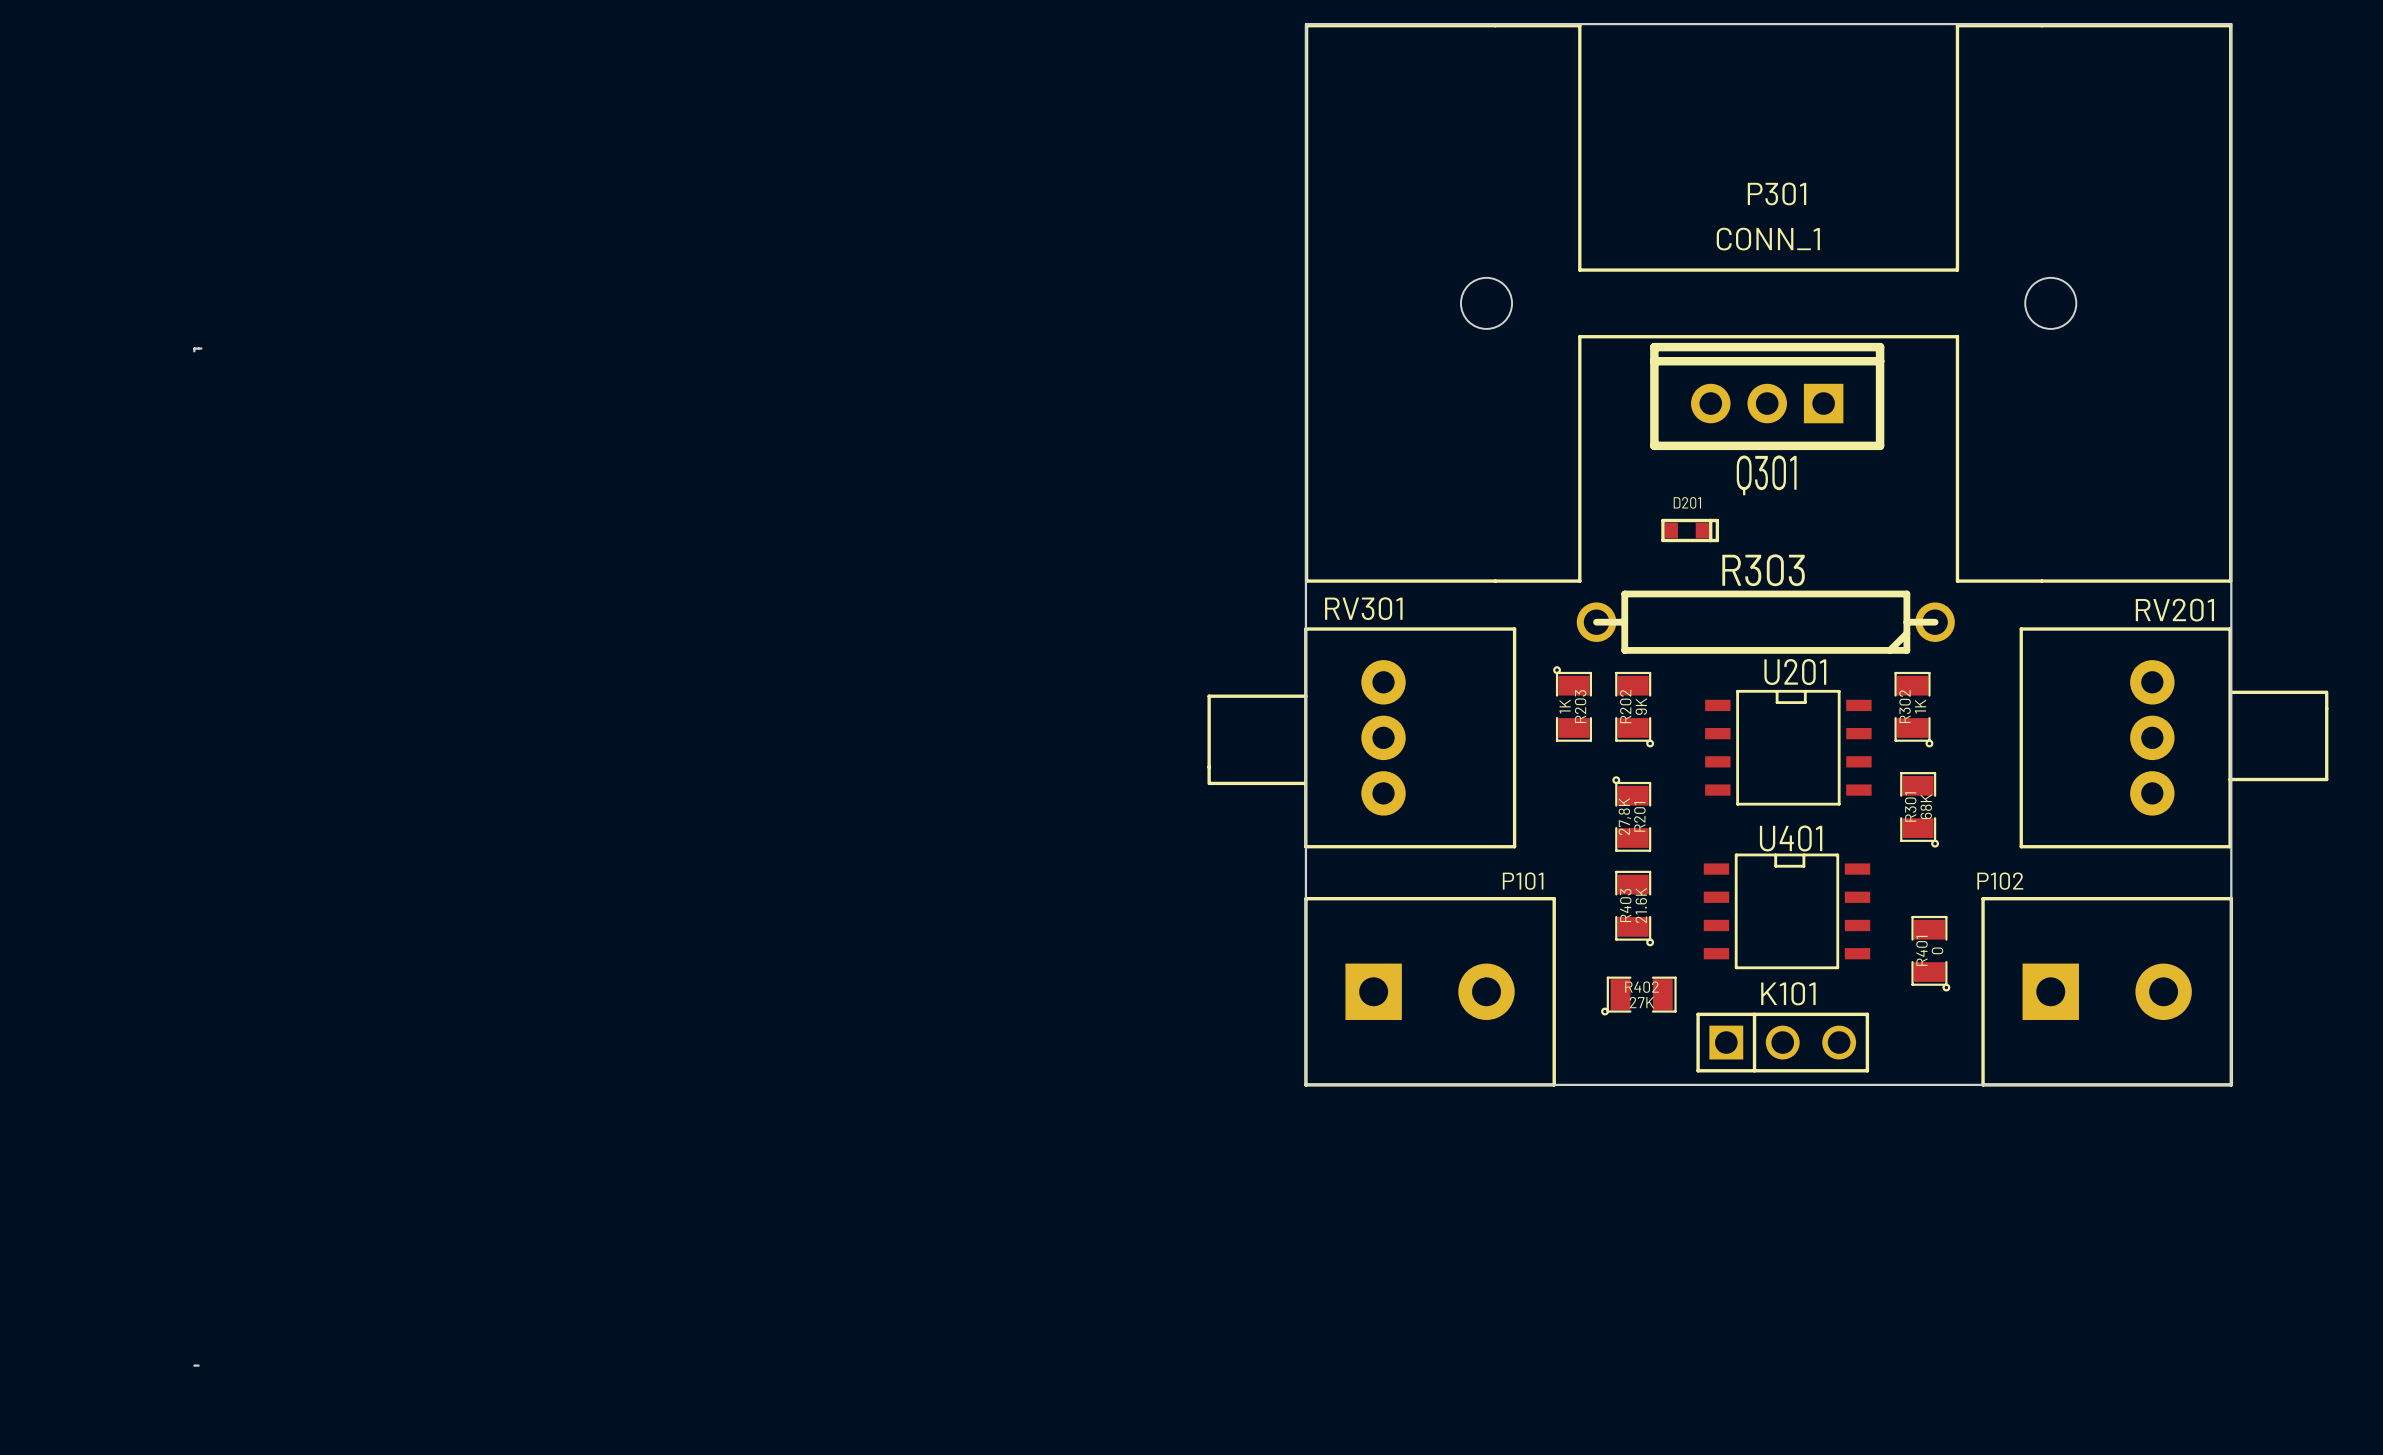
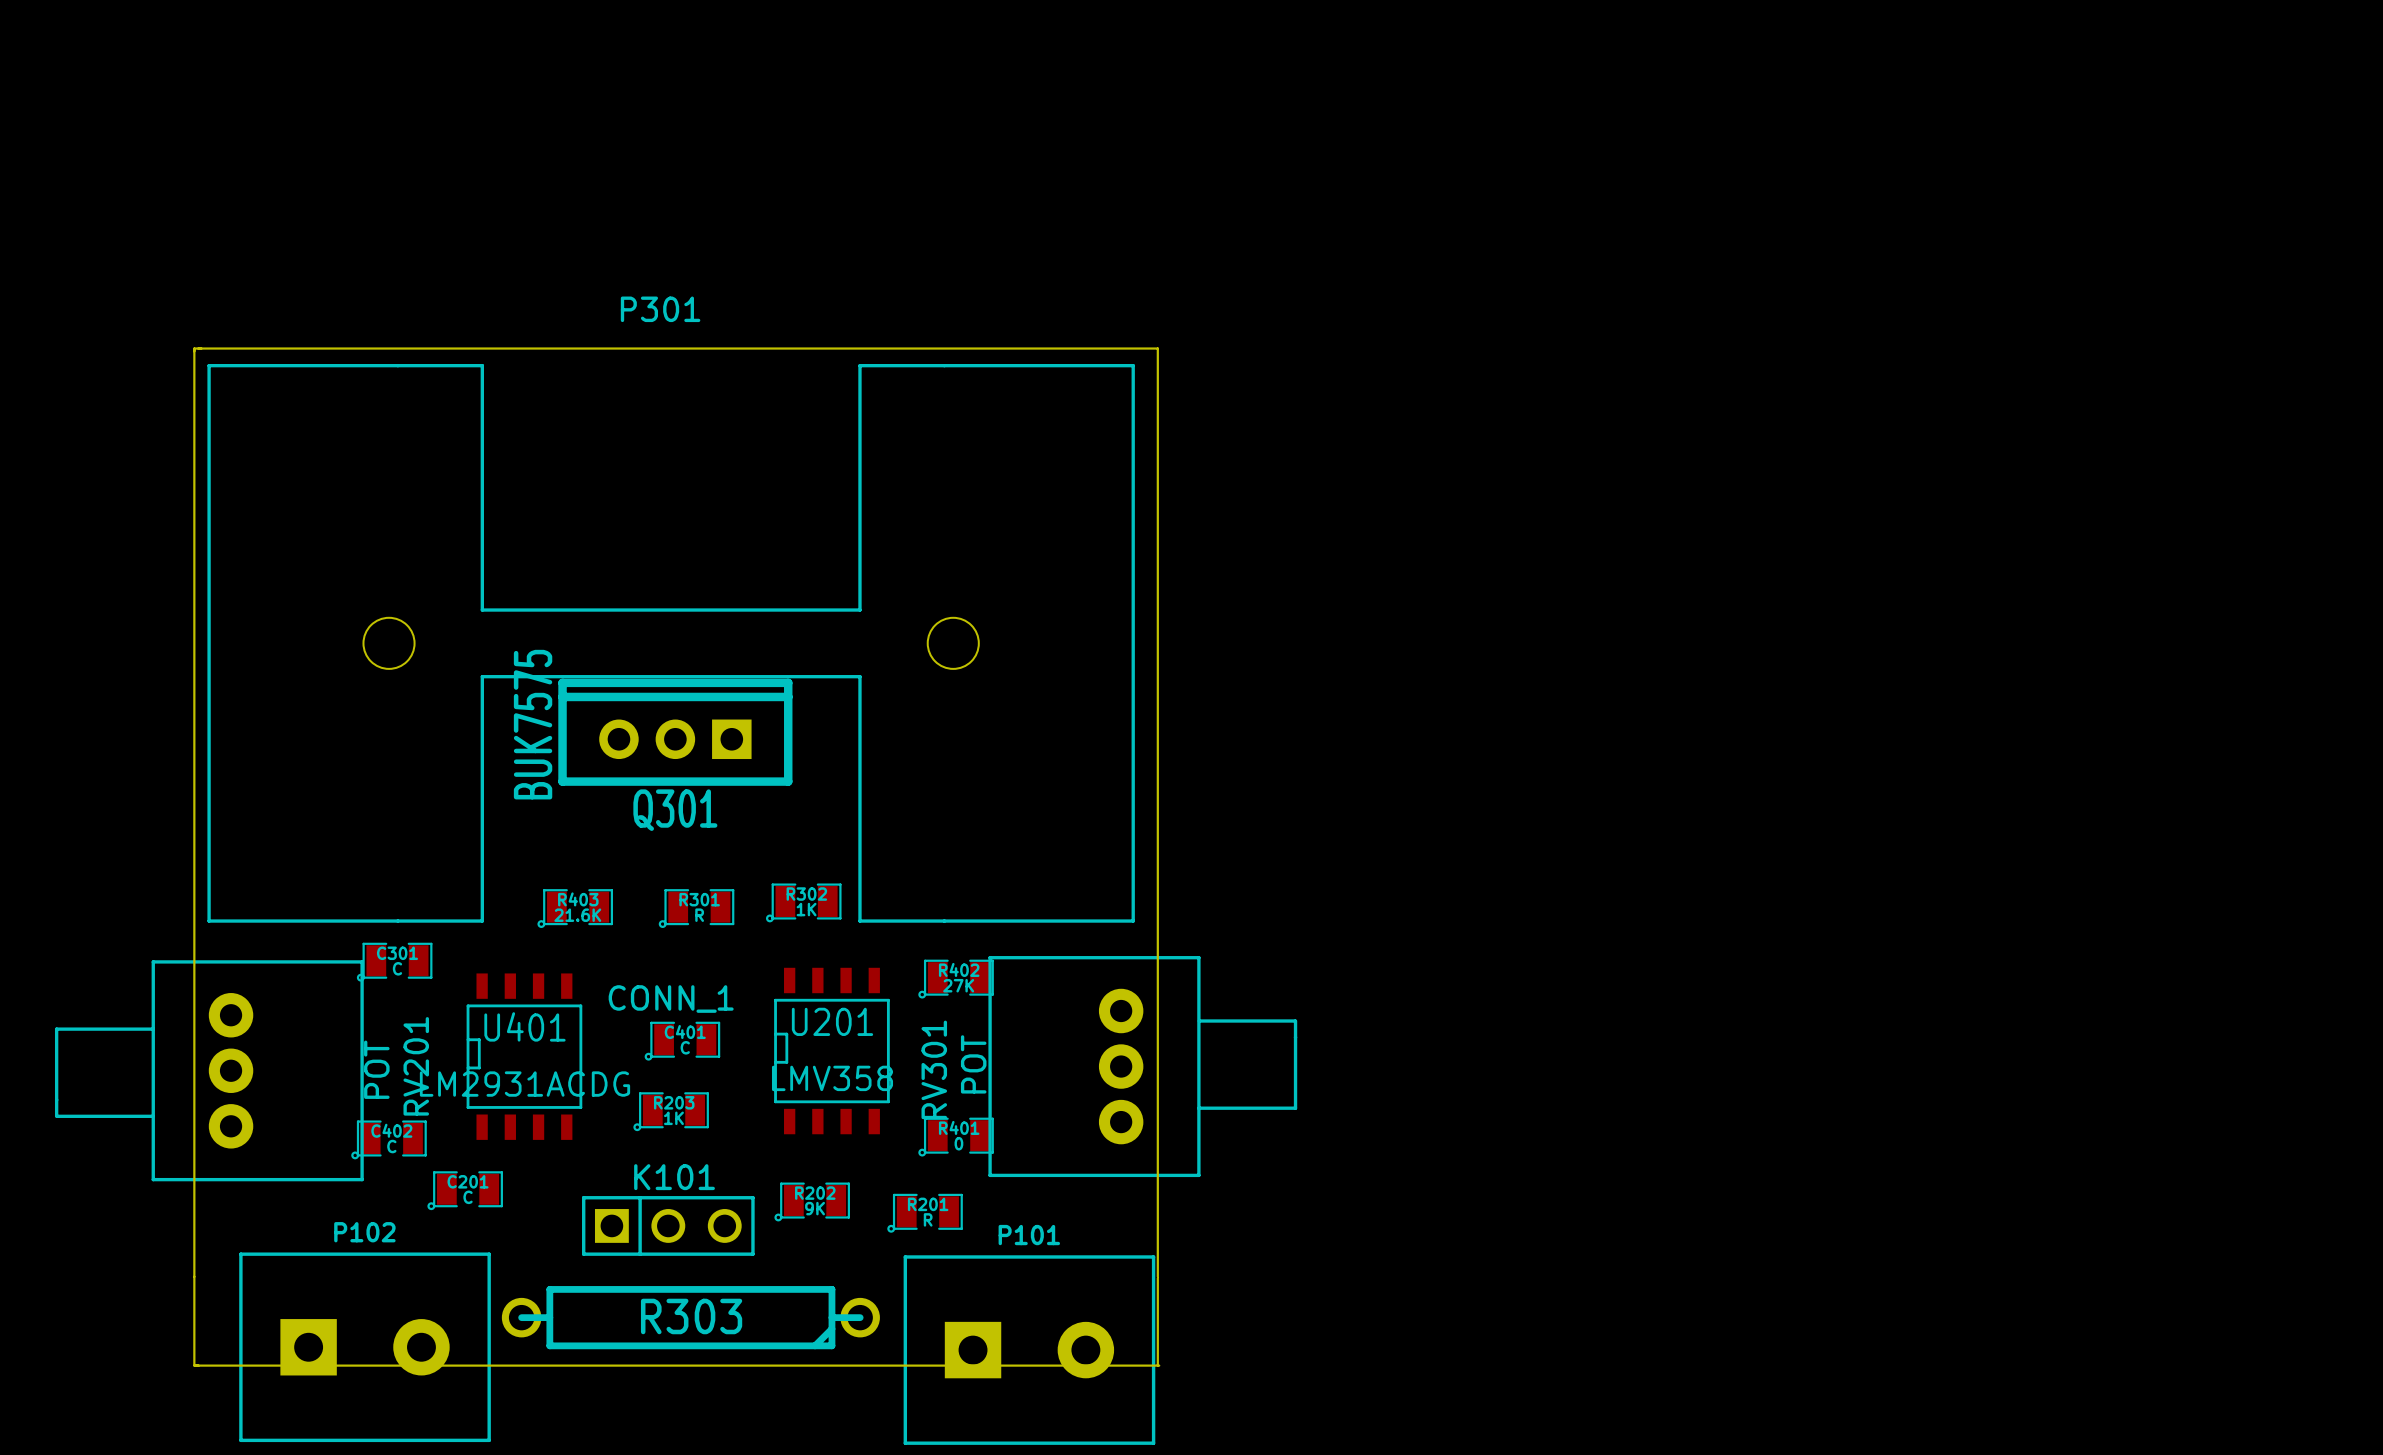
board edge: (1305, 24) (2231, 24) (2231, 1084) (1305, 1084) (1305, 24) -> none
P301 name position: P301 (1777, 193) -> P301 (660, 309)
P301 value position: CONN_1 (1768, 239) -> CONN_1 (671, 999)
P301 position: (1768, 303) -> (671, 643)
board edge: none -> (201, 348) (1157, 348) (1157, 1276)
board edge: none -> (194, 351) (194, 1365)
Q301 position: (1767, 396) -> (675, 732)
D201: (1690, 530) -> none
R303 name position: R303 (1763, 570) -> R303 (691, 1316)
RV301 name position: RV301 (1363, 608) -> RV301 (934, 1069)
RV201 name position: RV201 (2174, 610) -> RV201 (416, 1066)
R303 position: (1765, 622) -> (690, 1317)
U201 name position: U201 (1795, 672) -> U201 (832, 1021)
R203 rotation: 0° (1572, 704) -> 90° counterclockwise (671, 1111)
R203 position: (1572, 704) -> (671, 1111)
R202 rotation: 0° (1634, 709) -> 90° clockwise (812, 1201)
R202 position: (1634, 709) -> (812, 1201)
R302 rotation: 0° (1913, 709) -> 90° clockwise (803, 902)
R302 position: (1913, 709) -> (803, 902)
Q301 value: none -> BUK7575 (533, 724)
RV301 rotation: 0° (1361, 737) -> 180° (1142, 1066)
RV301 position: (1361, 737) -> (1142, 1066)
RV201 rotation: 0° (2173, 737) -> 180° (209, 1070)
RV201 position: (2173, 737) -> (209, 1070)
U201 rotation: 0° (1788, 747) -> 90° counterclockwise (831, 1051)
U201 position: (1788, 747) -> (831, 1051)
R301 value: 68K (1926, 806) -> R (699, 915)
R301 rotation: 0° (1919, 809) -> 90° clockwise (696, 908)
R301 position: (1919, 809) -> (696, 908)
R201 rotation: 0° (1631, 814) -> 90° counterclockwise (925, 1213)
R201 position: (1631, 814) -> (925, 1213)
R201 value: 27,8K (1624, 816) -> R (928, 1219)
P101 name position: P101 (1523, 881) -> P101 (1029, 1235)
P102 name position: P102 (2000, 881) -> P102 (364, 1232)
R403 rotation: 0° (1634, 908) -> 90° clockwise (575, 908)
R403 position: (1634, 908) -> (575, 908)
U401 rotation: 0° (1786, 911) -> 90° counterclockwise (524, 1056)
U401 position: (1786, 911) -> (524, 1056)
R401 rotation: 0° (1930, 953) -> 90° clockwise (956, 1137)
R401 position: (1930, 953) -> (956, 1137)
C301: none -> C (394, 962)
P101 position: (1430, 991) -> (1029, 1350)
P102 position: (2107, 991) -> (365, 1347)
R402 position: (1638, 996) -> (956, 979)
C401: none -> C (682, 1041)
K101 position: (1782, 1042) -> (668, 1225)
RV301 value: none -> POT (973, 1064)
RV201 value: none -> POT (376, 1069)
U201 value: none -> LMV358 (832, 1078)
U401 value: none -> LM2931ACDG (524, 1084)
C402: none -> C (389, 1139)
C201: none -> C (465, 1190)
board edge: none -> (1157, 1278) (1157, 1365)
board edge: none -> (198, 1365) (1159, 1365)

